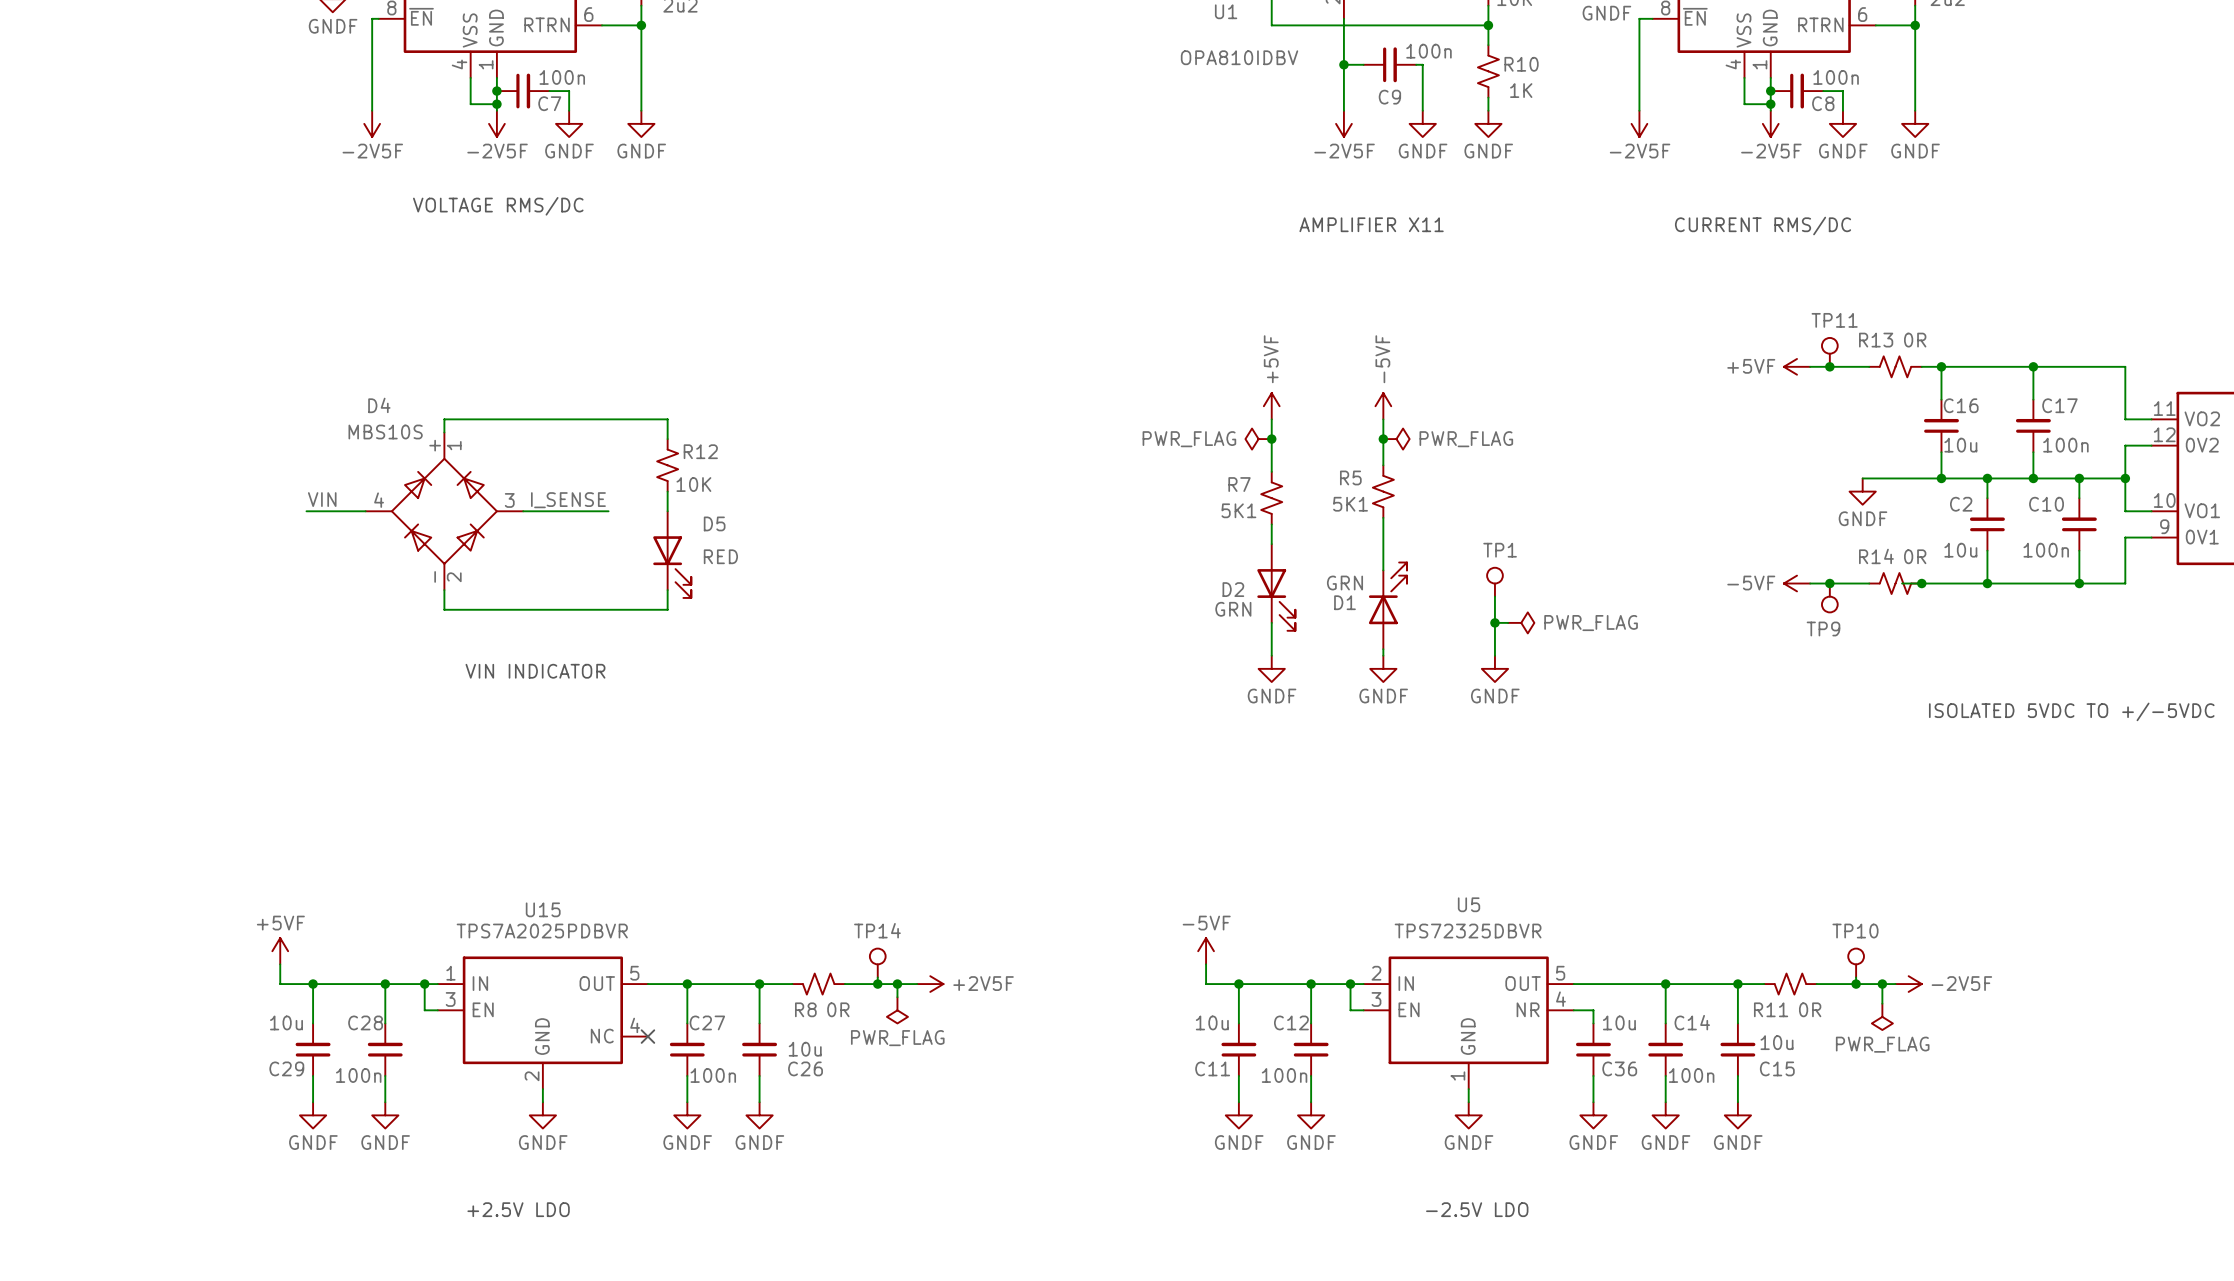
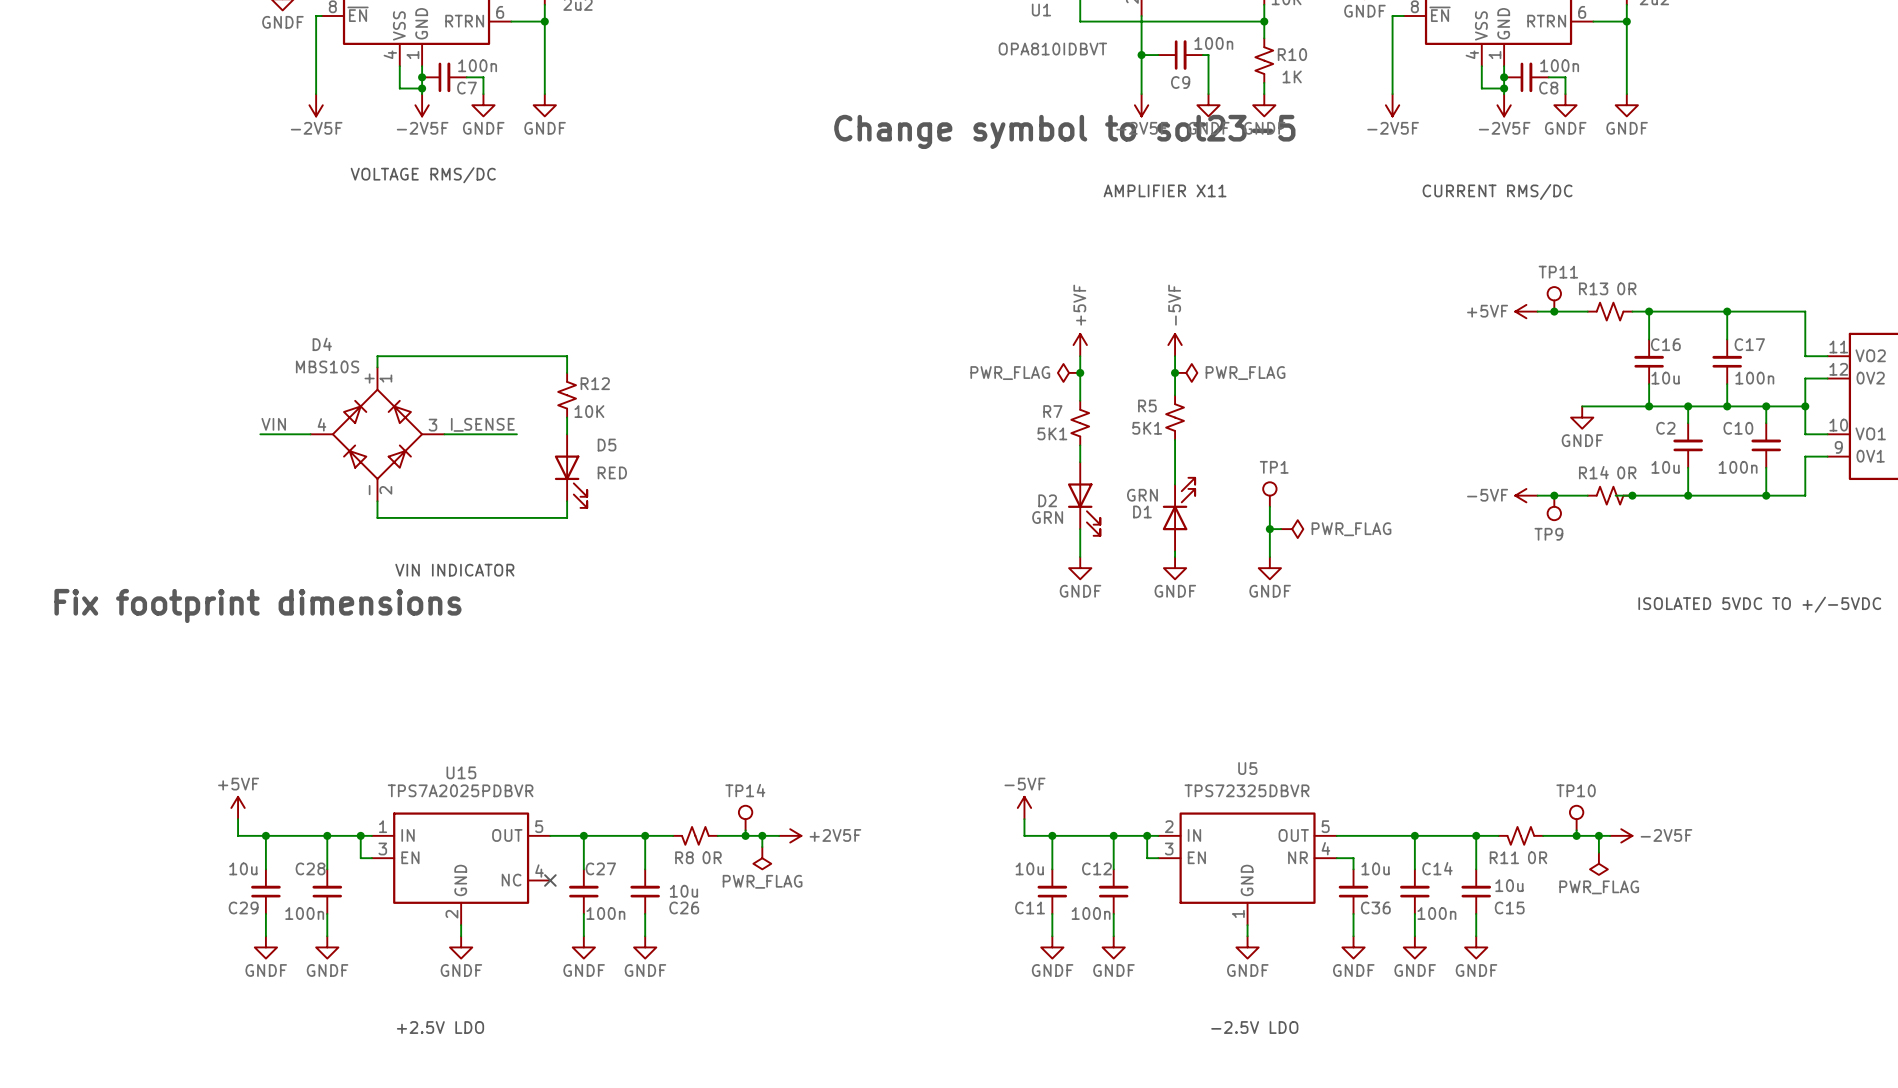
U1 value: OPA810IDBV (1239, 57) -> OPA810IDBVT (1052, 49)
text: none -> Change symbol to sot23-5 (1064, 131)
text: none -> Fix footprint dimensions (257, 605)

